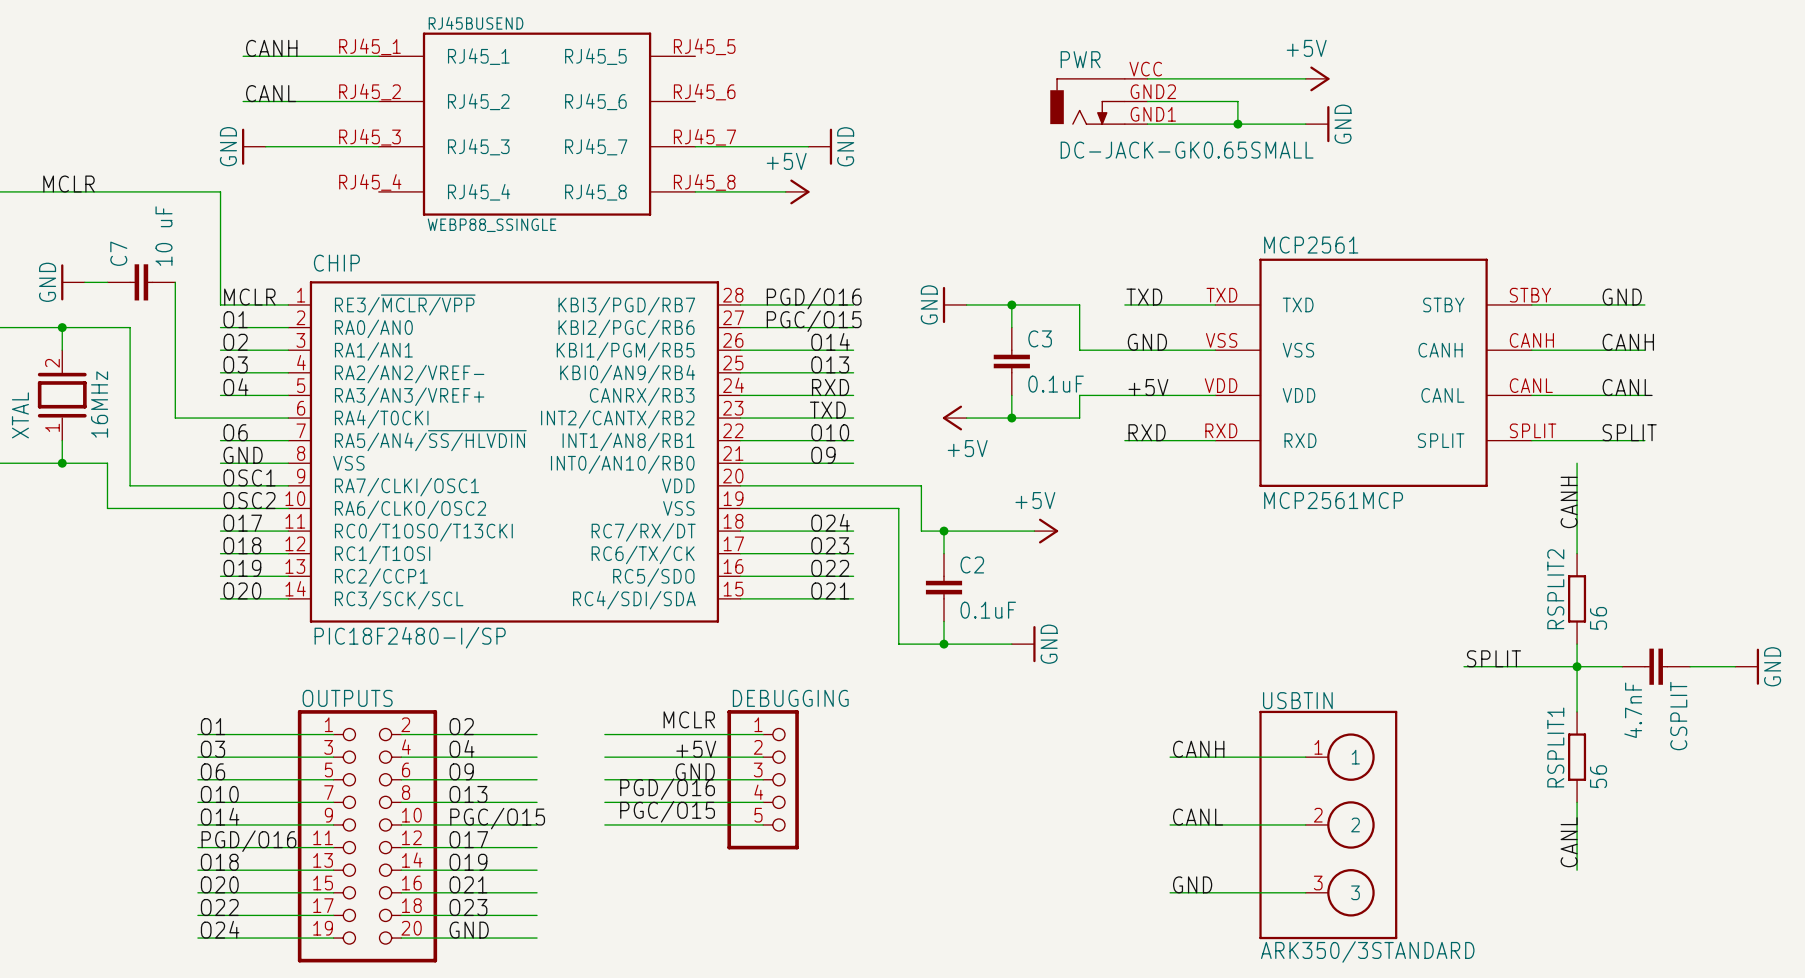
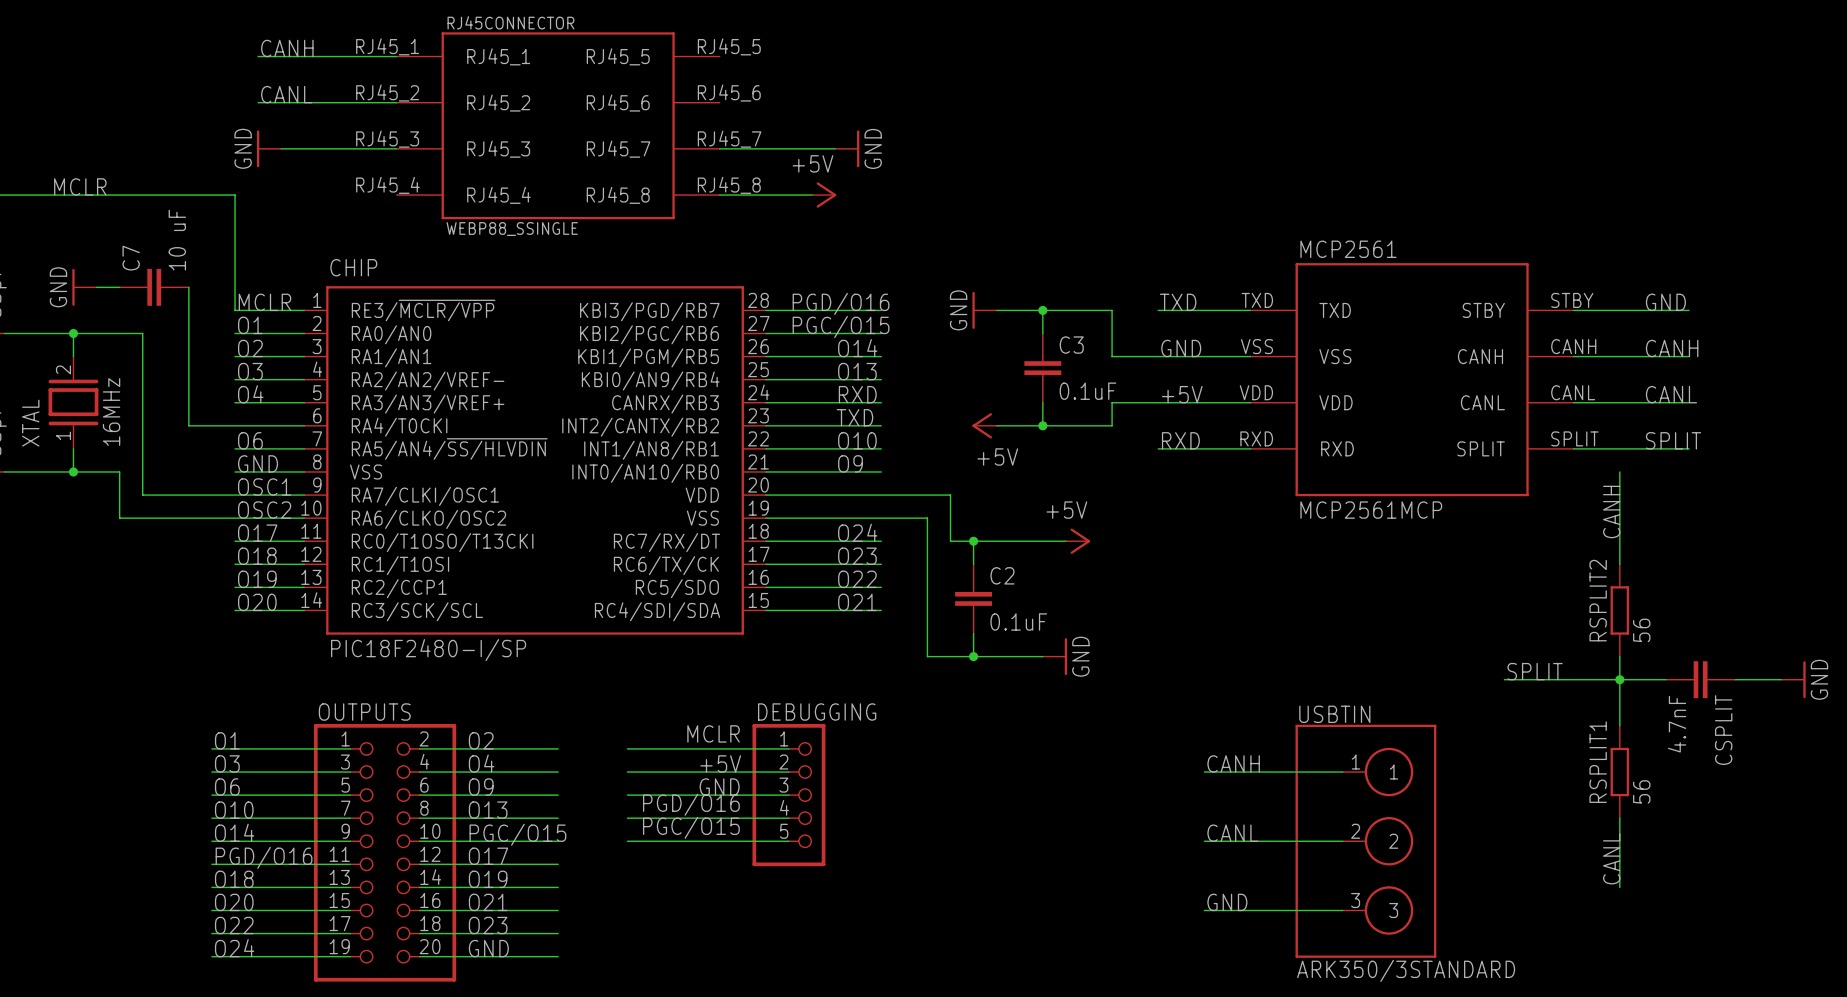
RJ45BUSEND name: RJ45BUSEND (476, 23) -> RJ45CONNECTOR (510, 22)
wire: (1147, 78) (1305, 78) -> none
power symbol: +5V (1317, 78) -> none
PWR: DC-JACK-GK0.65SMALL (1098, 101) -> none
wire: (1147, 101) (1237, 101) (1237, 124) -> none
wire: (1147, 124) (1305, 124) -> none
junction: (1237, 124) -> none
power symbol: GND (1317, 124) -> none

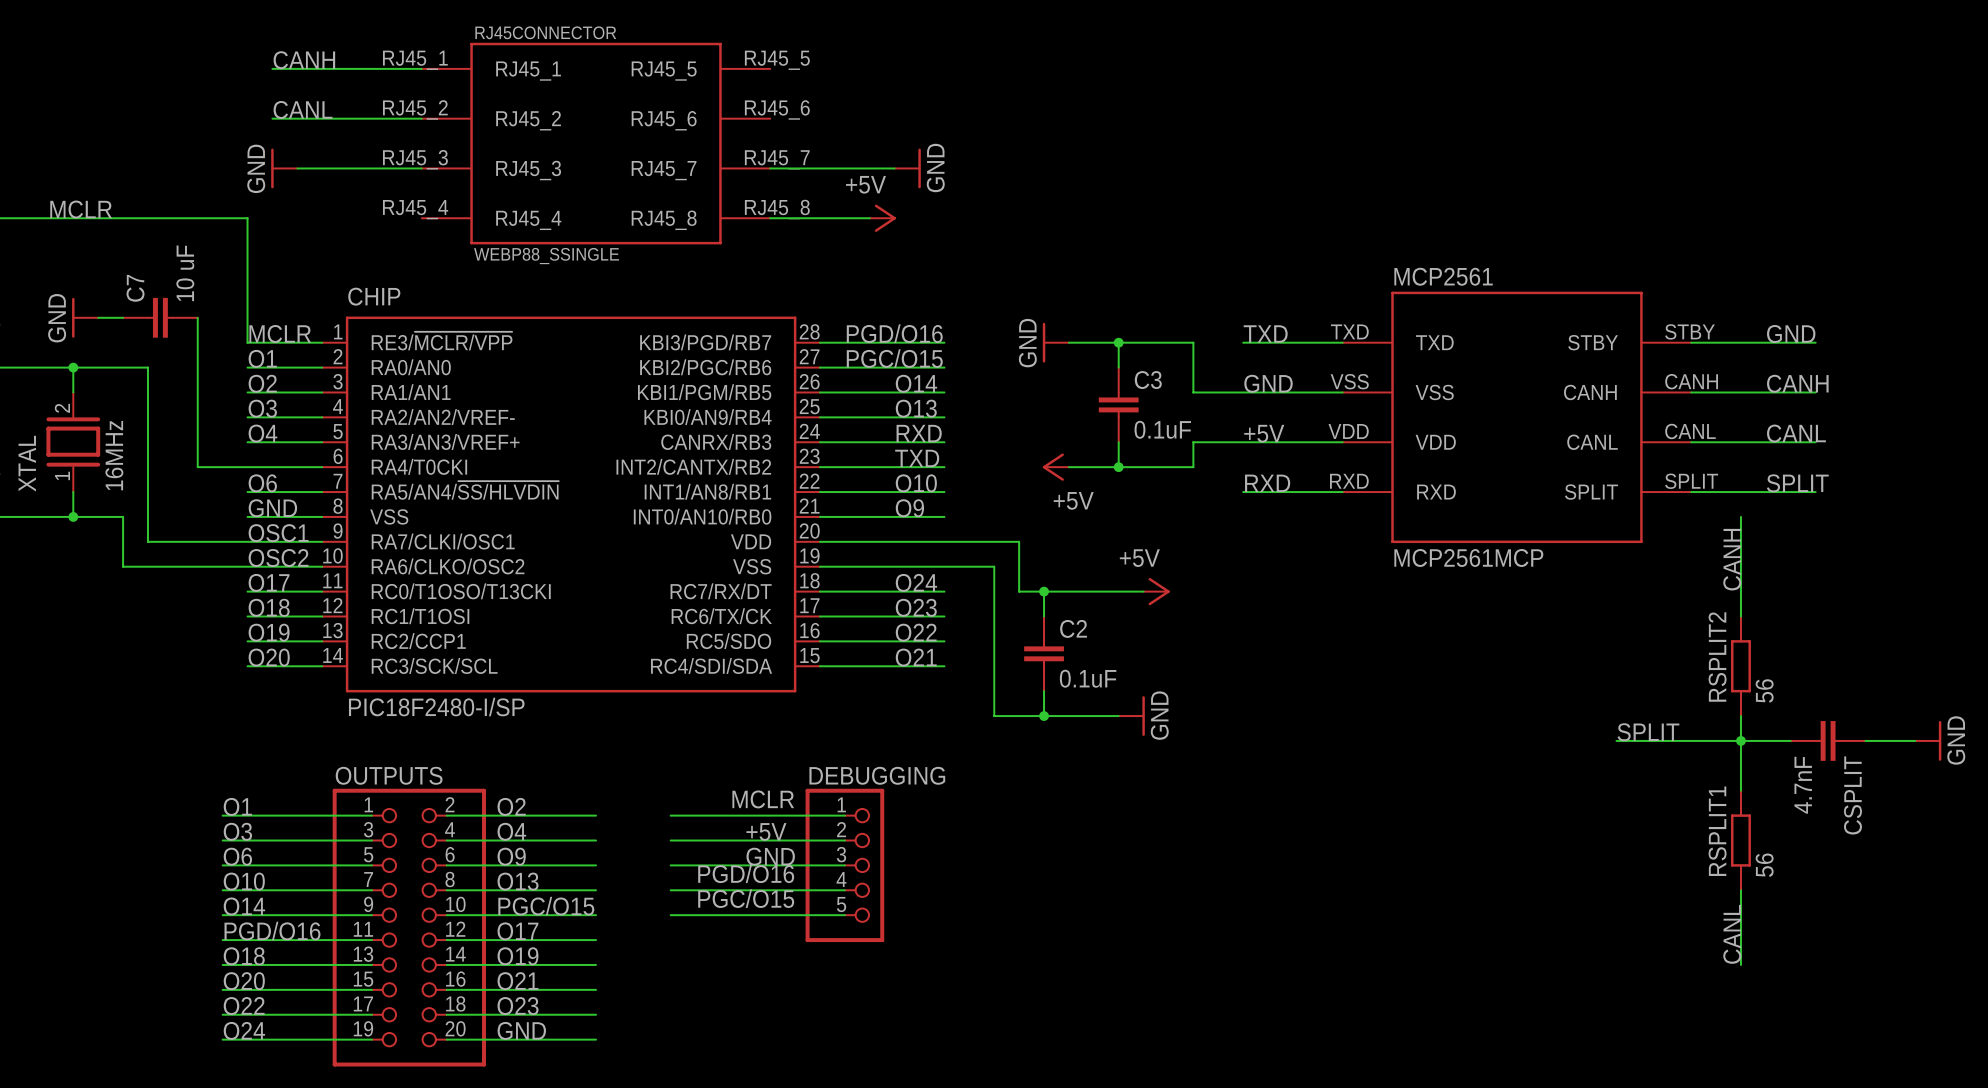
label: CANH (1233, 763) -> none
wire: (1204, 772) (1342, 772) -> none
label: CANL (1232, 833) -> none
wire: (1204, 841) (1342, 841) -> none
USBTIN: ARK350/3STANDARD (1365, 841) -> none
label: GND (1227, 902) -> none
wire: (1204, 910) (1342, 910) -> none

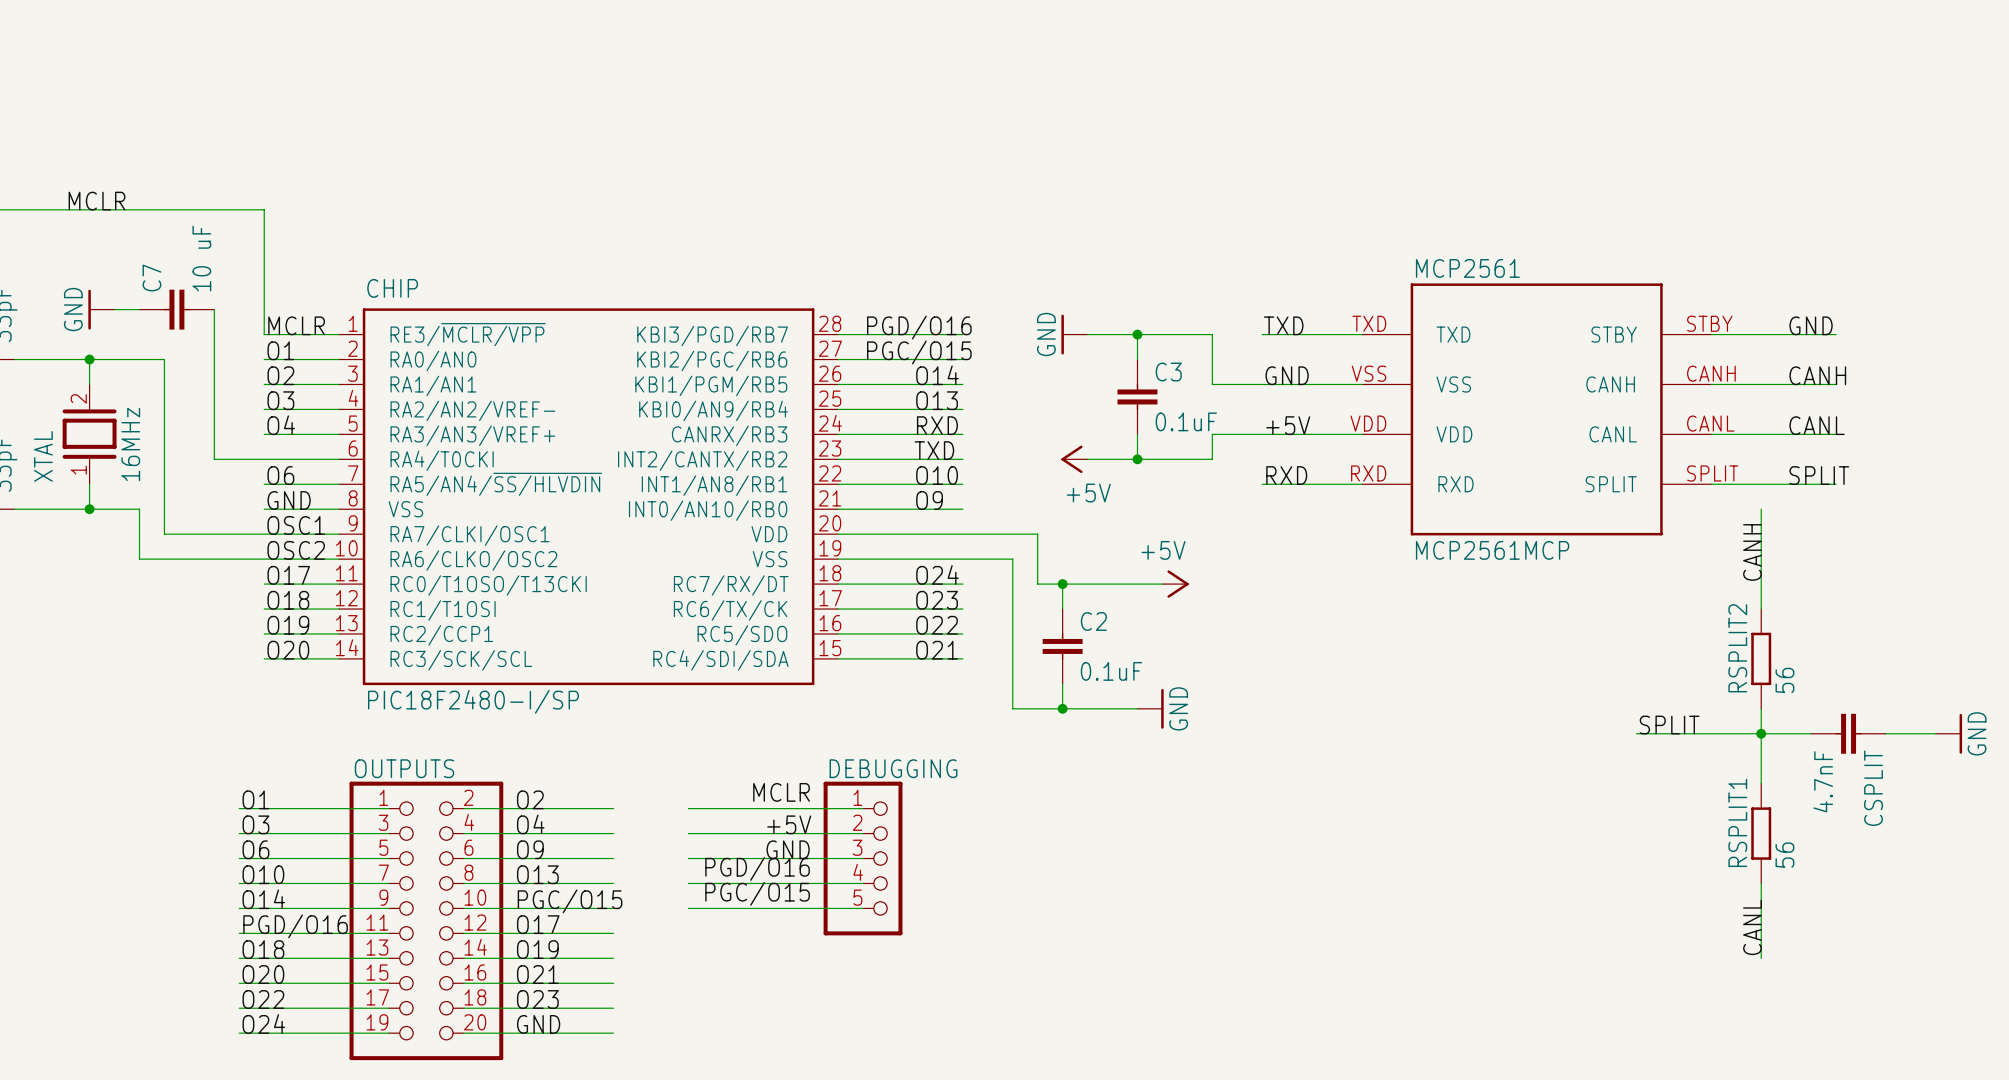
label: CANH (304, 60) -> none
wire: (272, 68) (421, 68) -> none
label: CANL (303, 109) -> none
wire: (272, 118) (421, 118) -> none
RJ45CONNECTOR: WEBP88_SSINGLE (596, 143) -> none
power symbol: GND (284, 168) -> none
wire: (297, 168) (421, 168) -> none
wire: (770, 168) (894, 168) -> none
power symbol: GND (907, 168) -> none
wire: (770, 218) (869, 218) -> none
power symbol: +5V (882, 218) -> none

